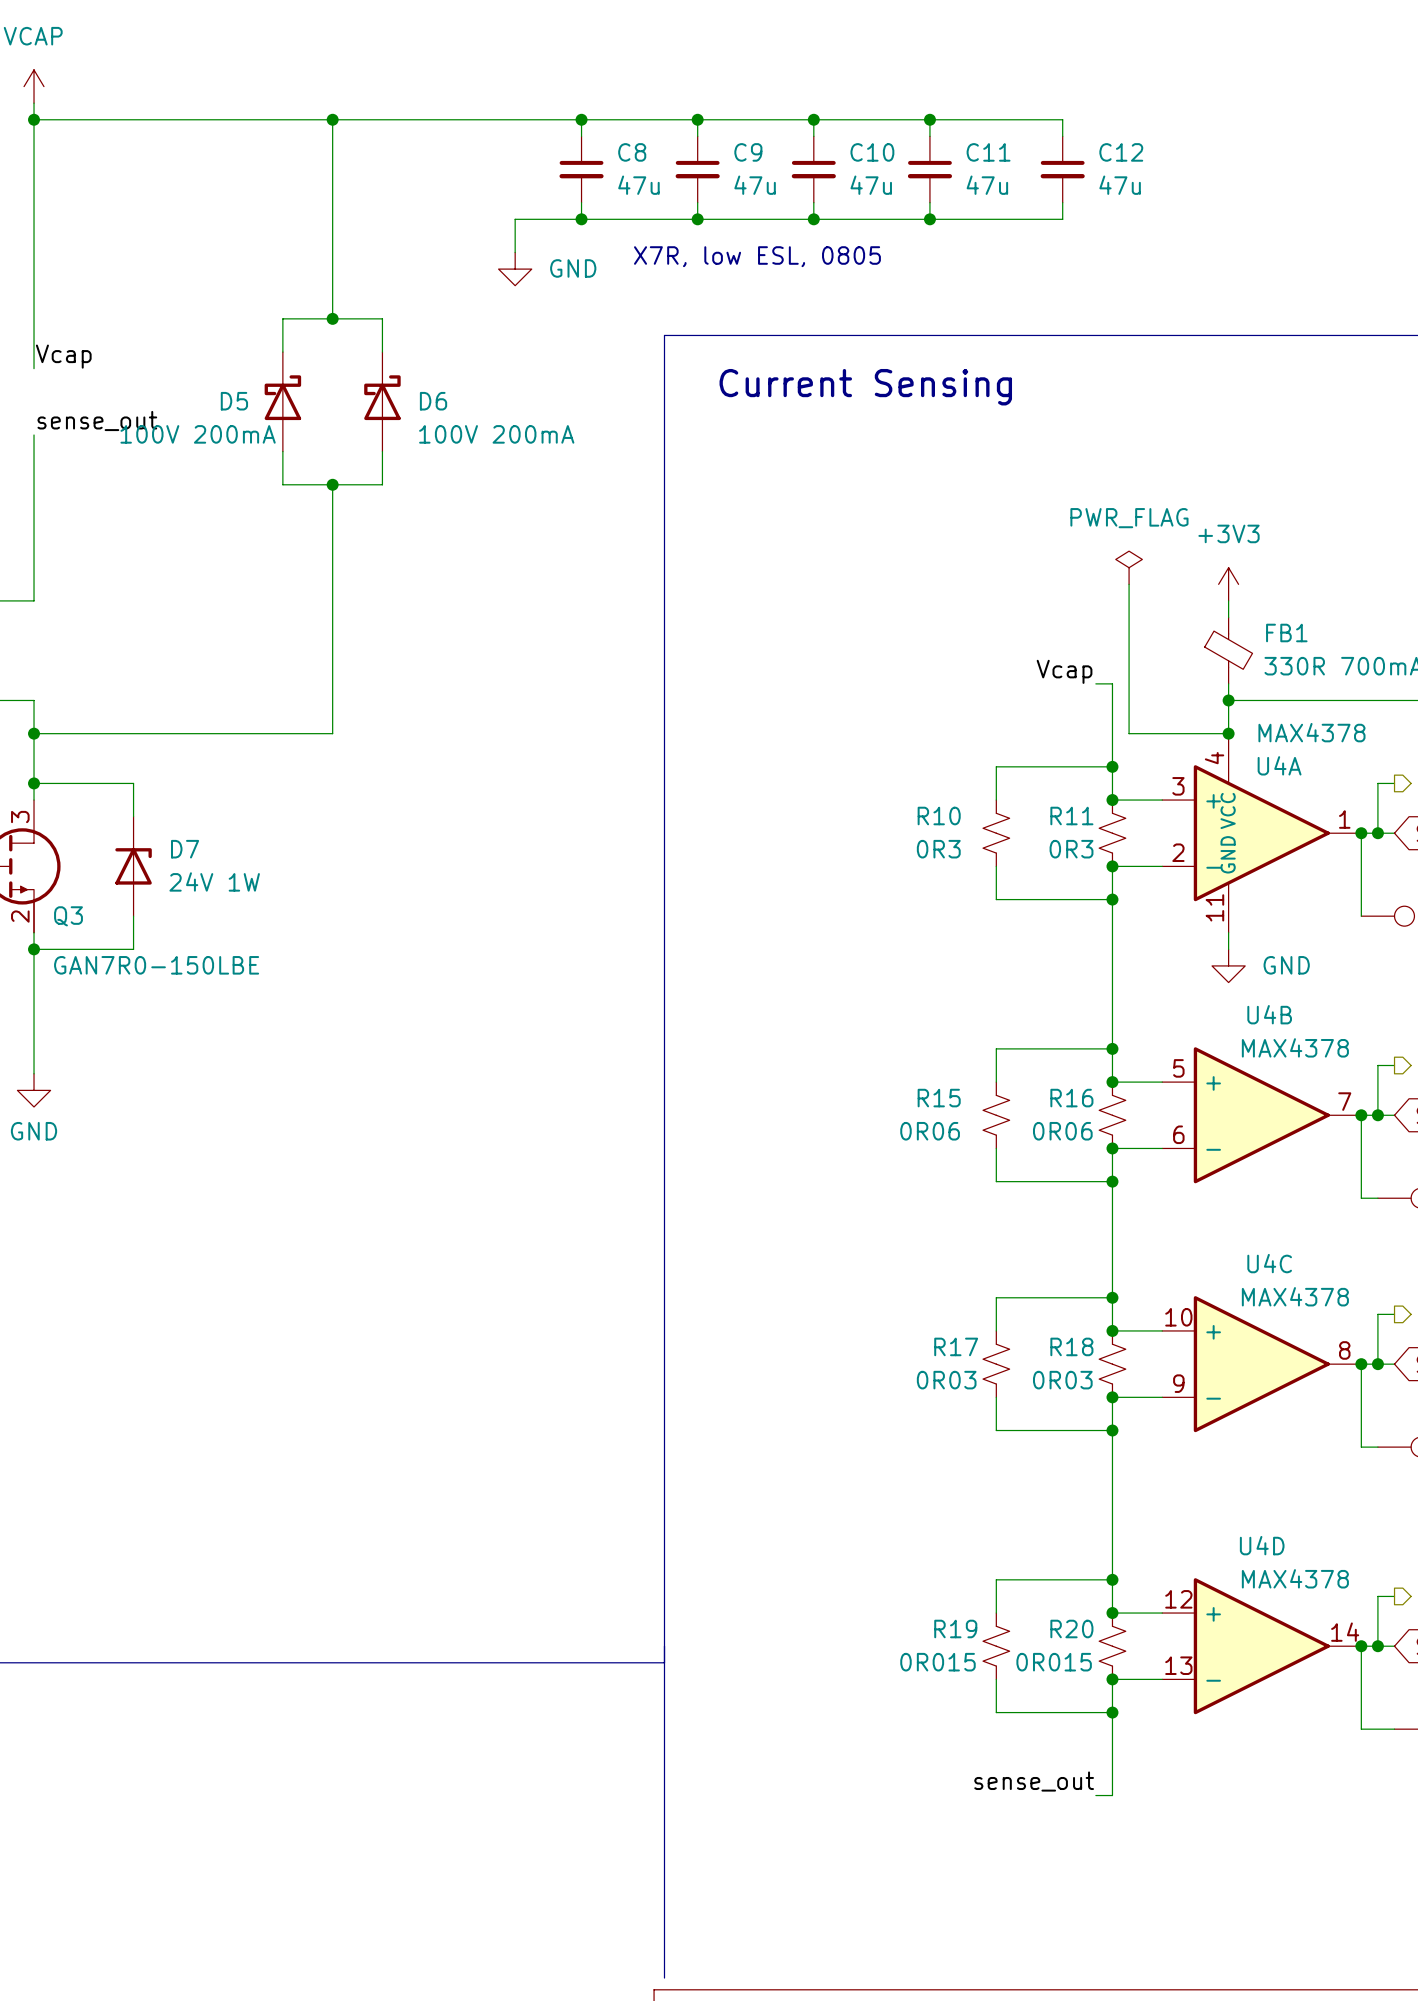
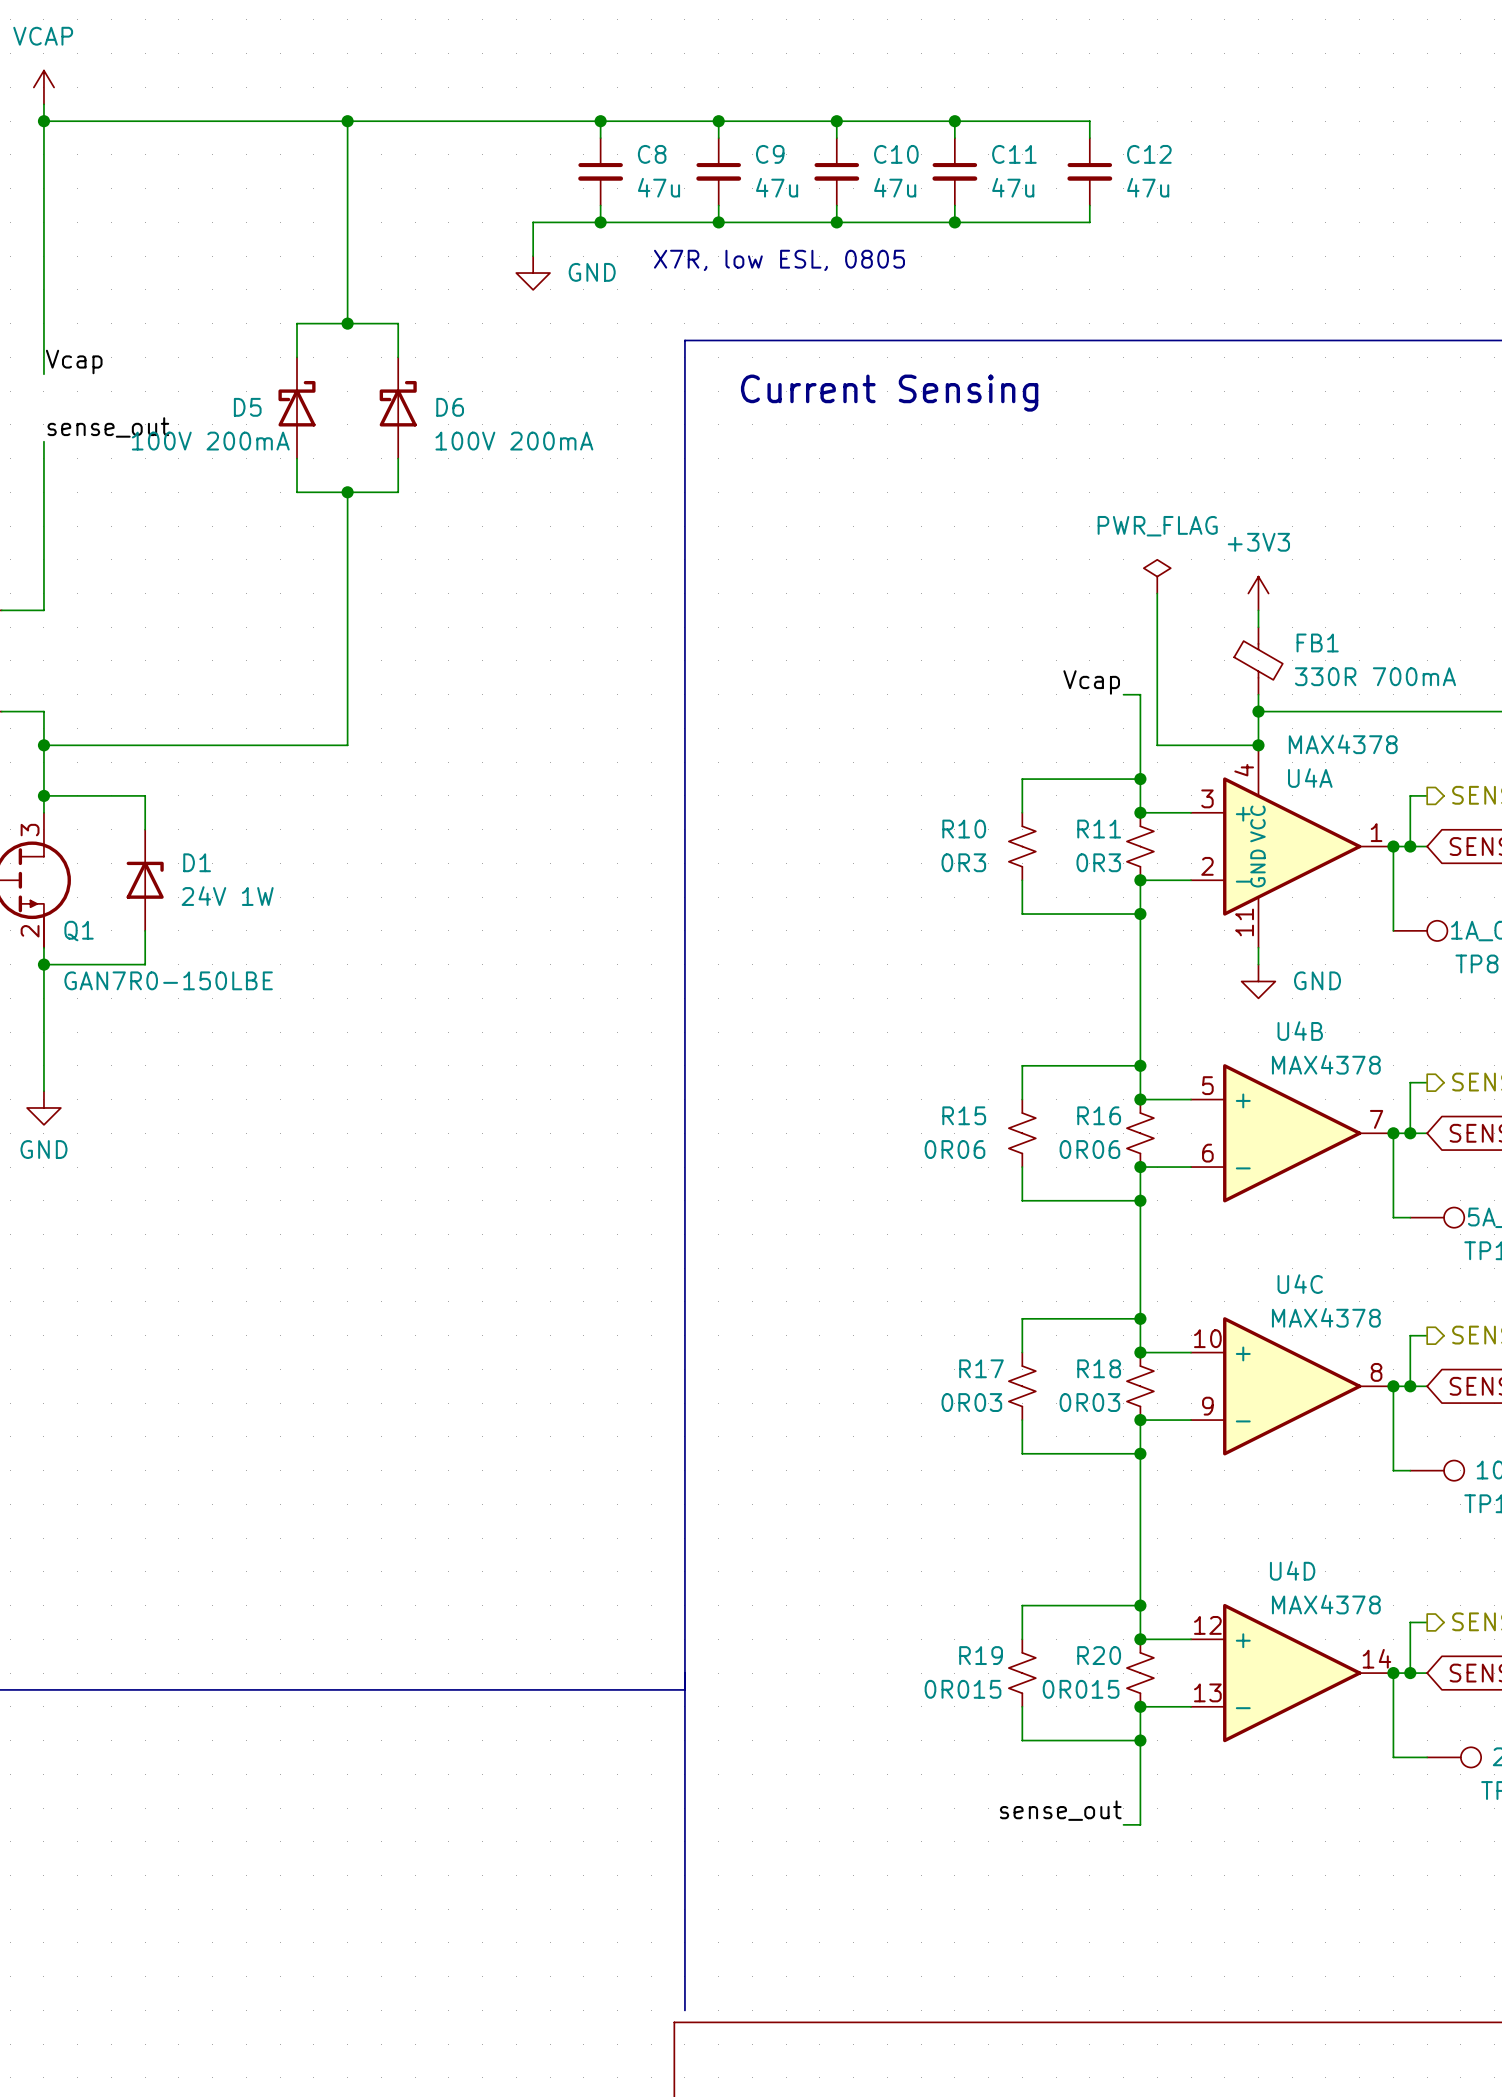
D7 name: D7 (185, 849) -> D1 (197, 862)
Q3 name: Q3 (68, 916) -> Q1 (79, 931)

